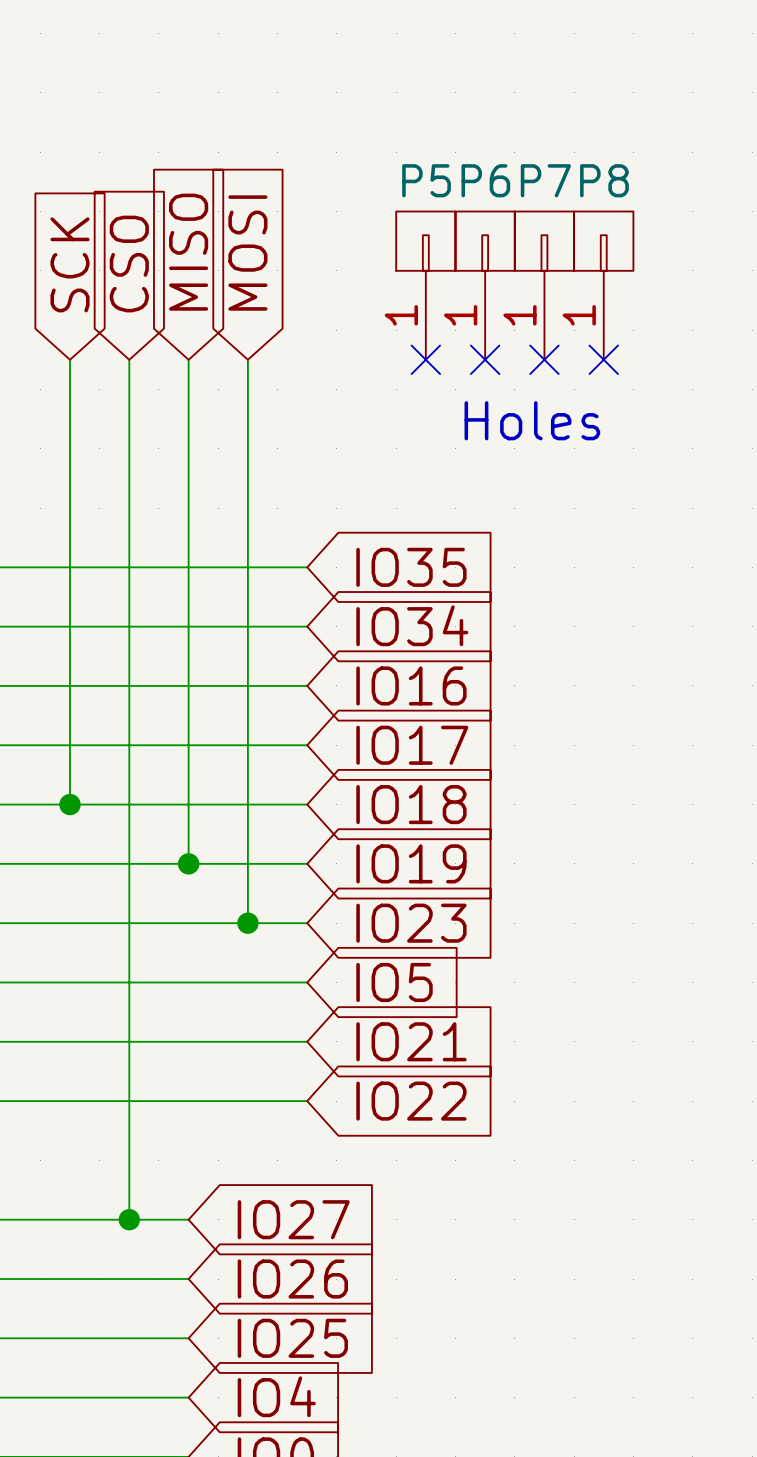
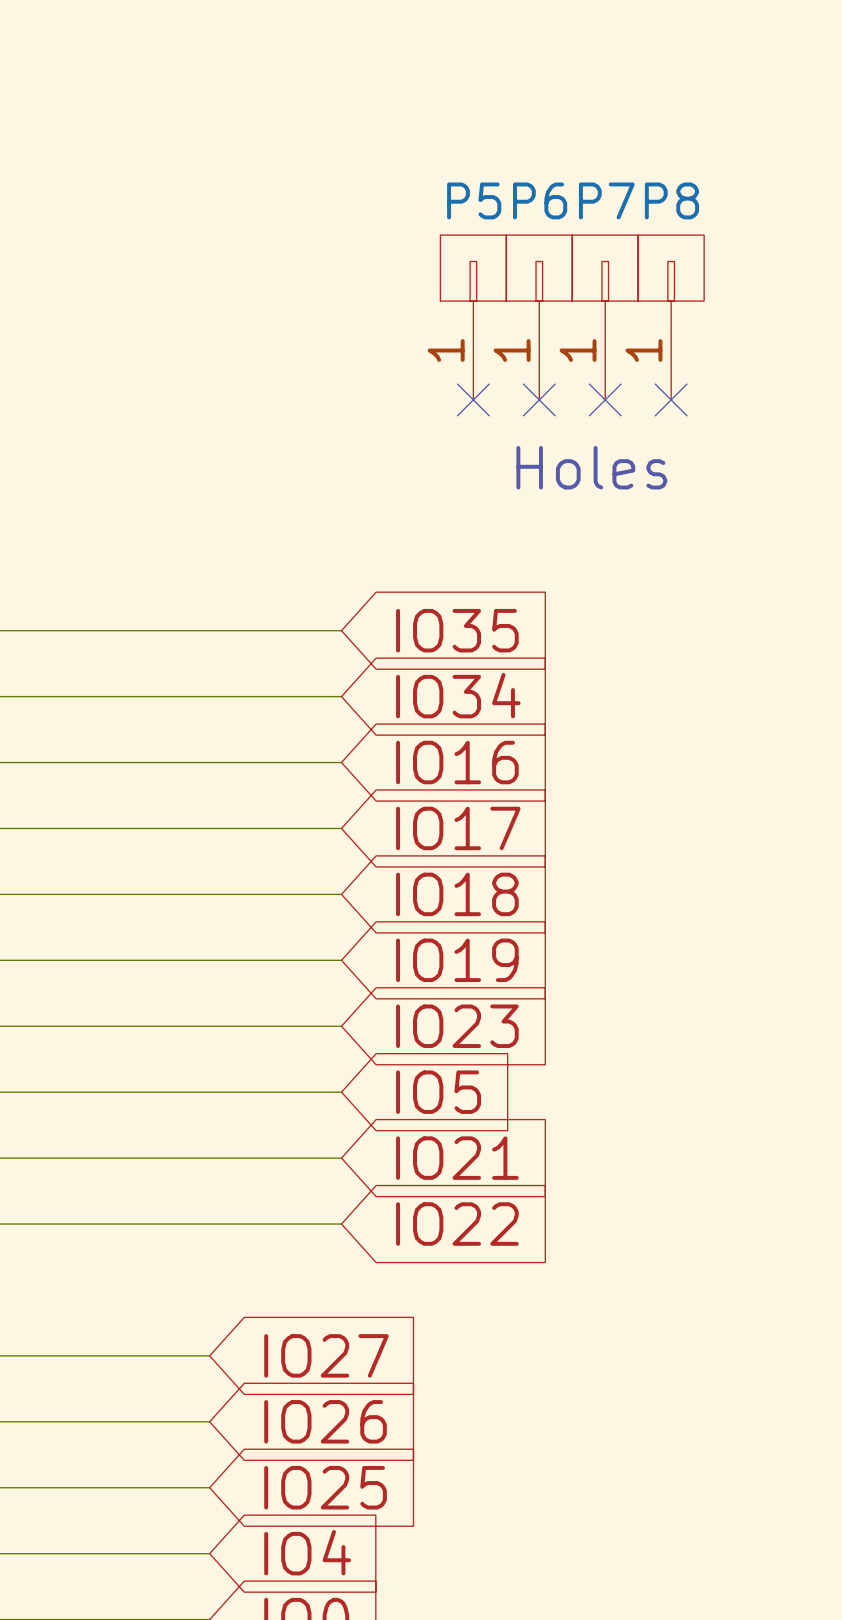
global label: MISO (188, 252) -> none
global label: MOSI (247, 253) -> none
global label: SCK (70, 264) -> none
global label: CSO (129, 264) -> none
wire: (70, 359) (70, 804) -> none
wire: (129, 359) (129, 1219) -> none
wire: (188, 359) (188, 863) -> none
wire: (247, 359) (247, 923) -> none
junction: (70, 804) -> none
junction: (188, 863) -> none
junction: (247, 923) -> none
junction: (129, 1219) -> none

